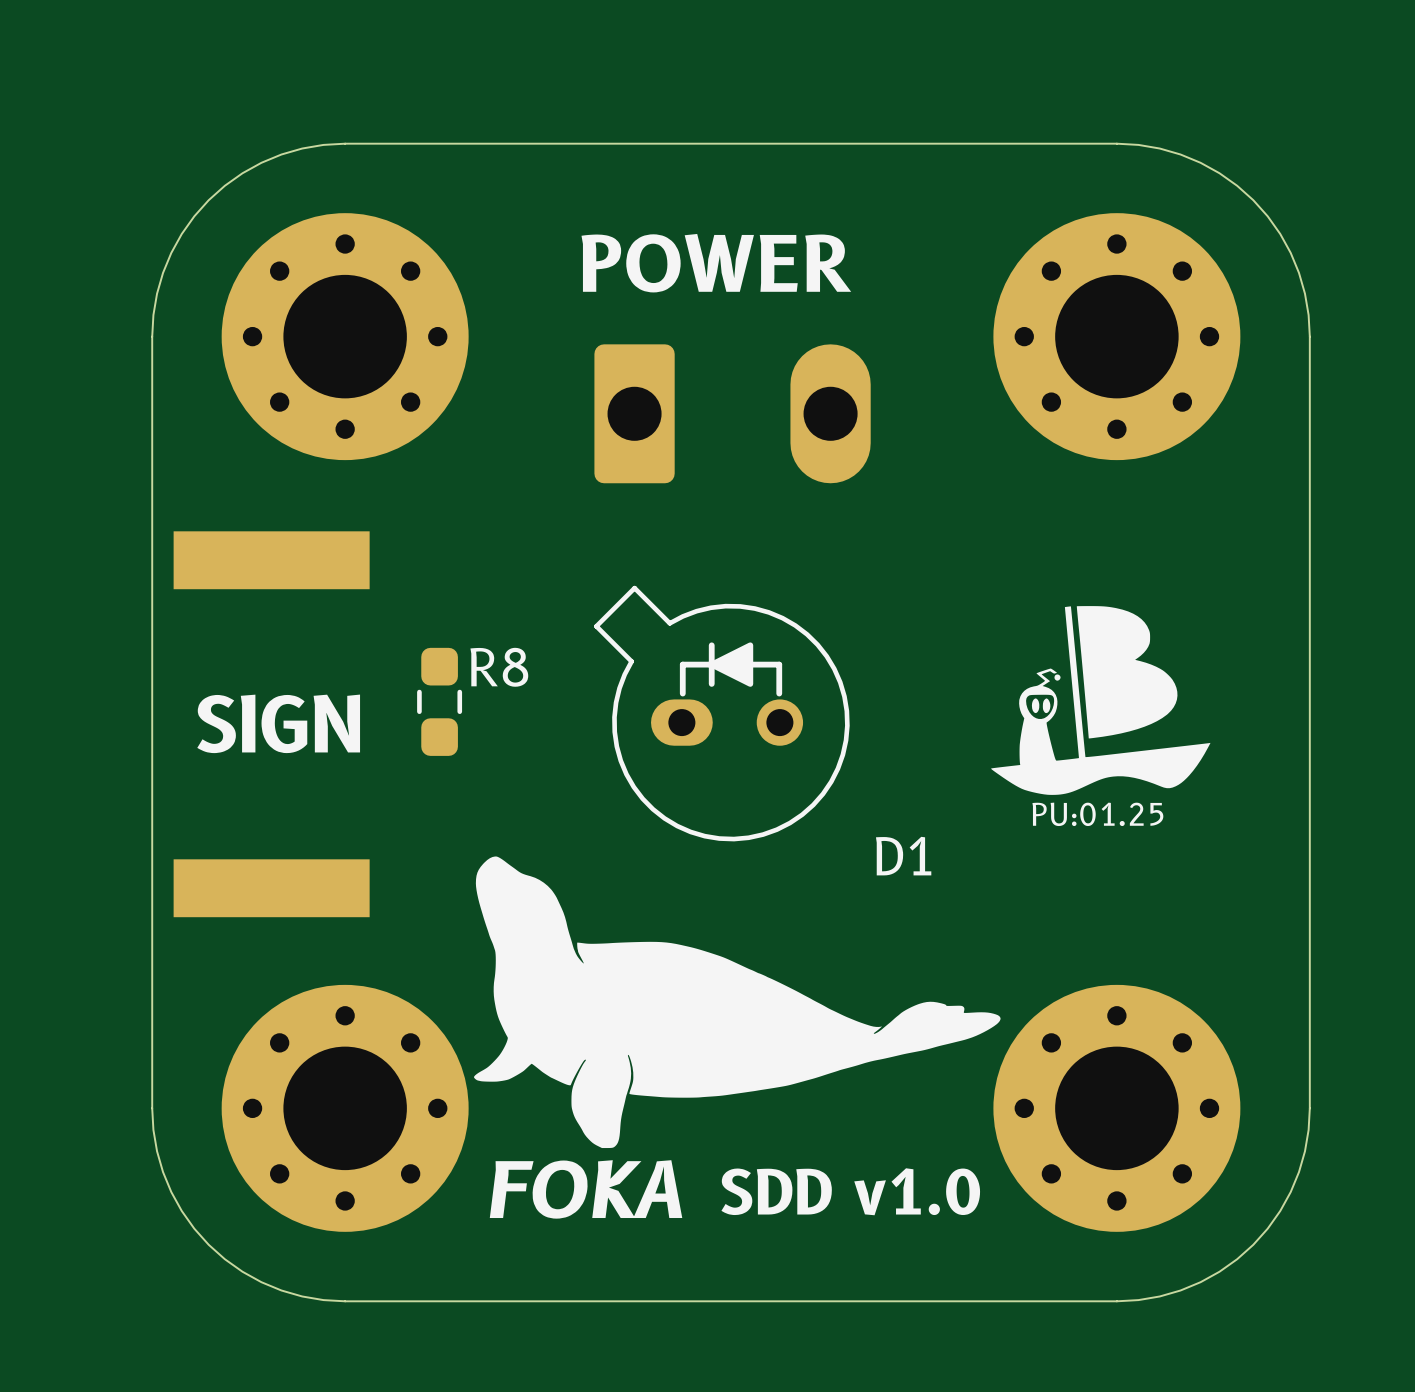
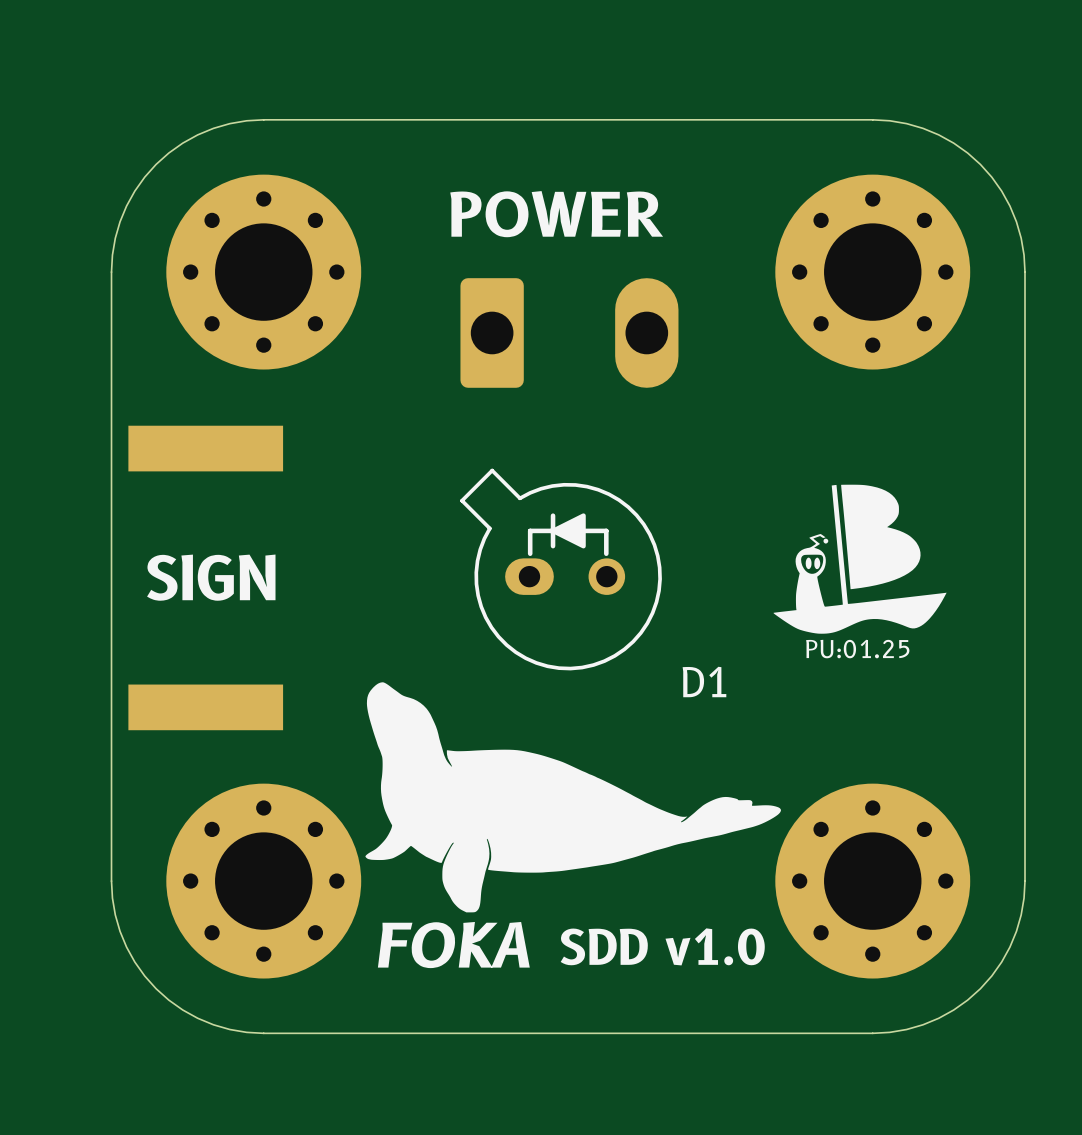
R8: (439, 701) -> none

